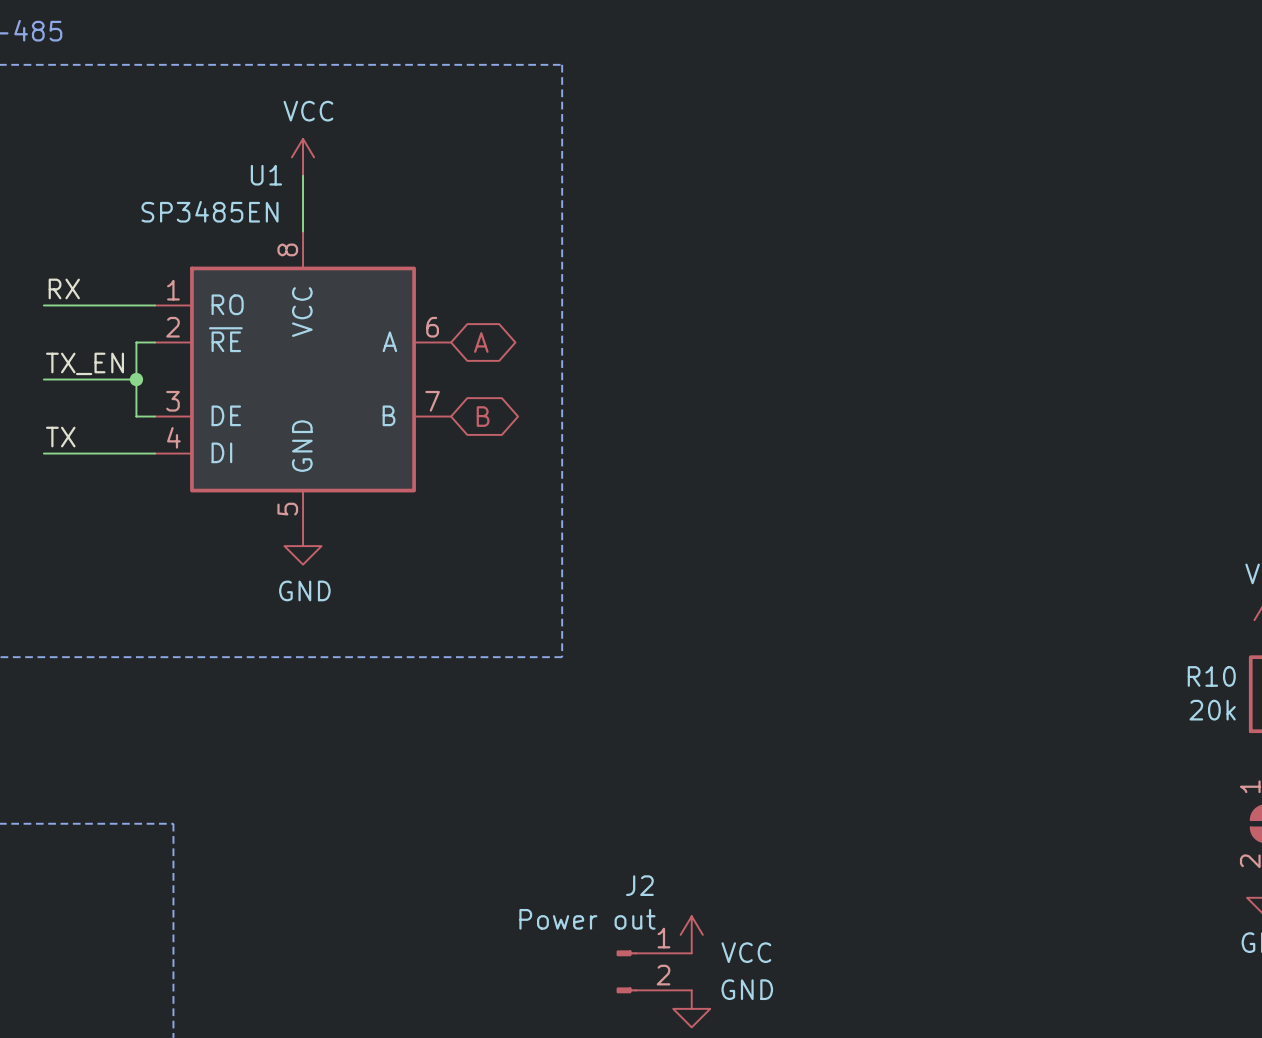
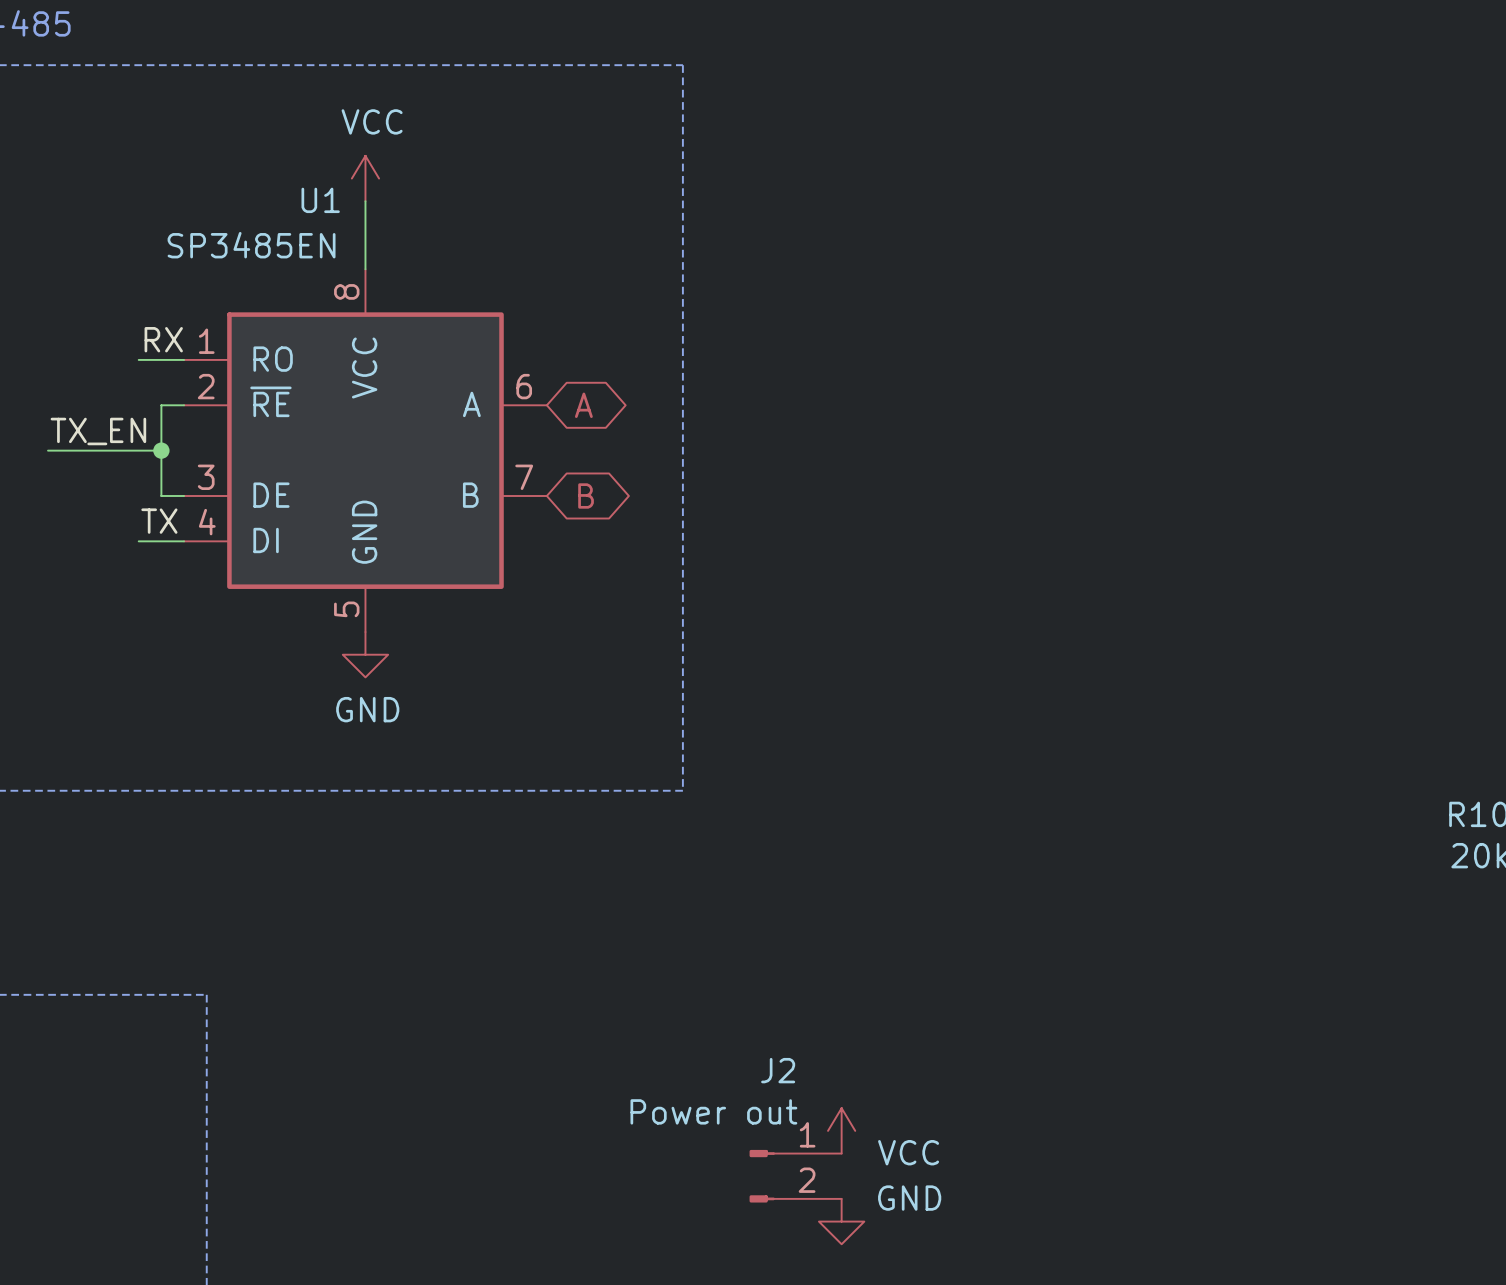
label position: RX (64, 288) -> RX (163, 339)
wire: (43, 305) (117, 305) -> none
label position: TX (60, 437) -> TX (159, 521)
wire: (43, 453) (117, 453) -> none

